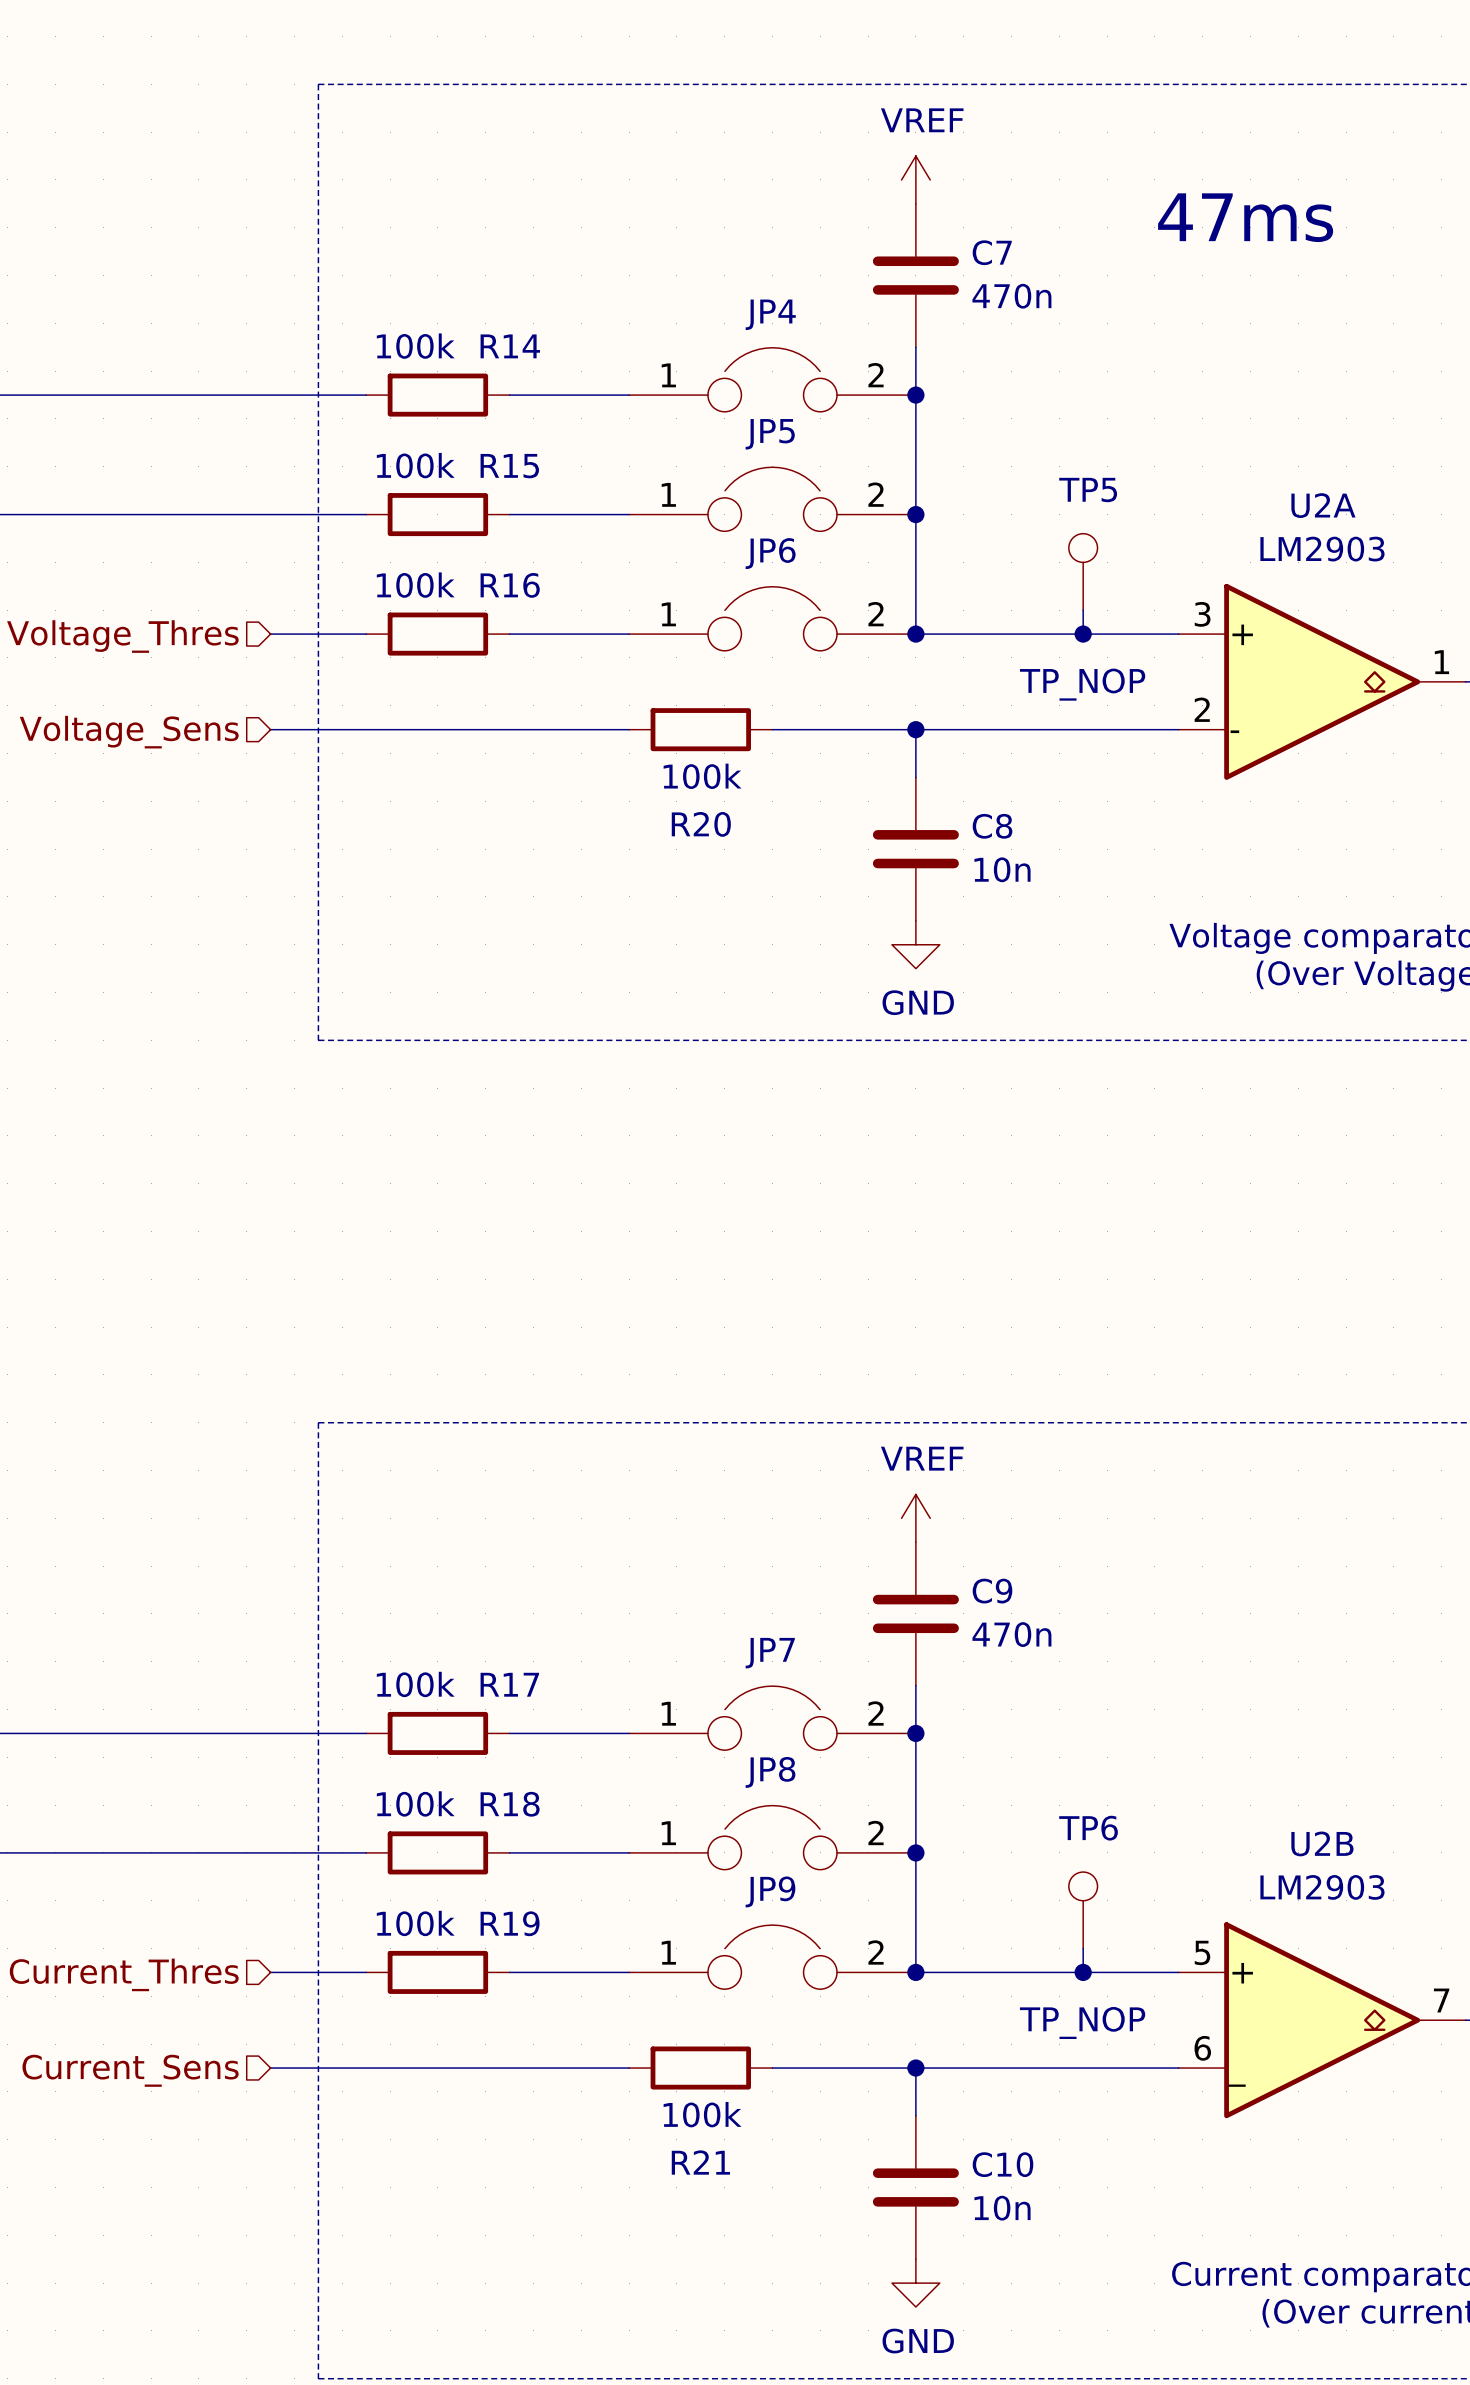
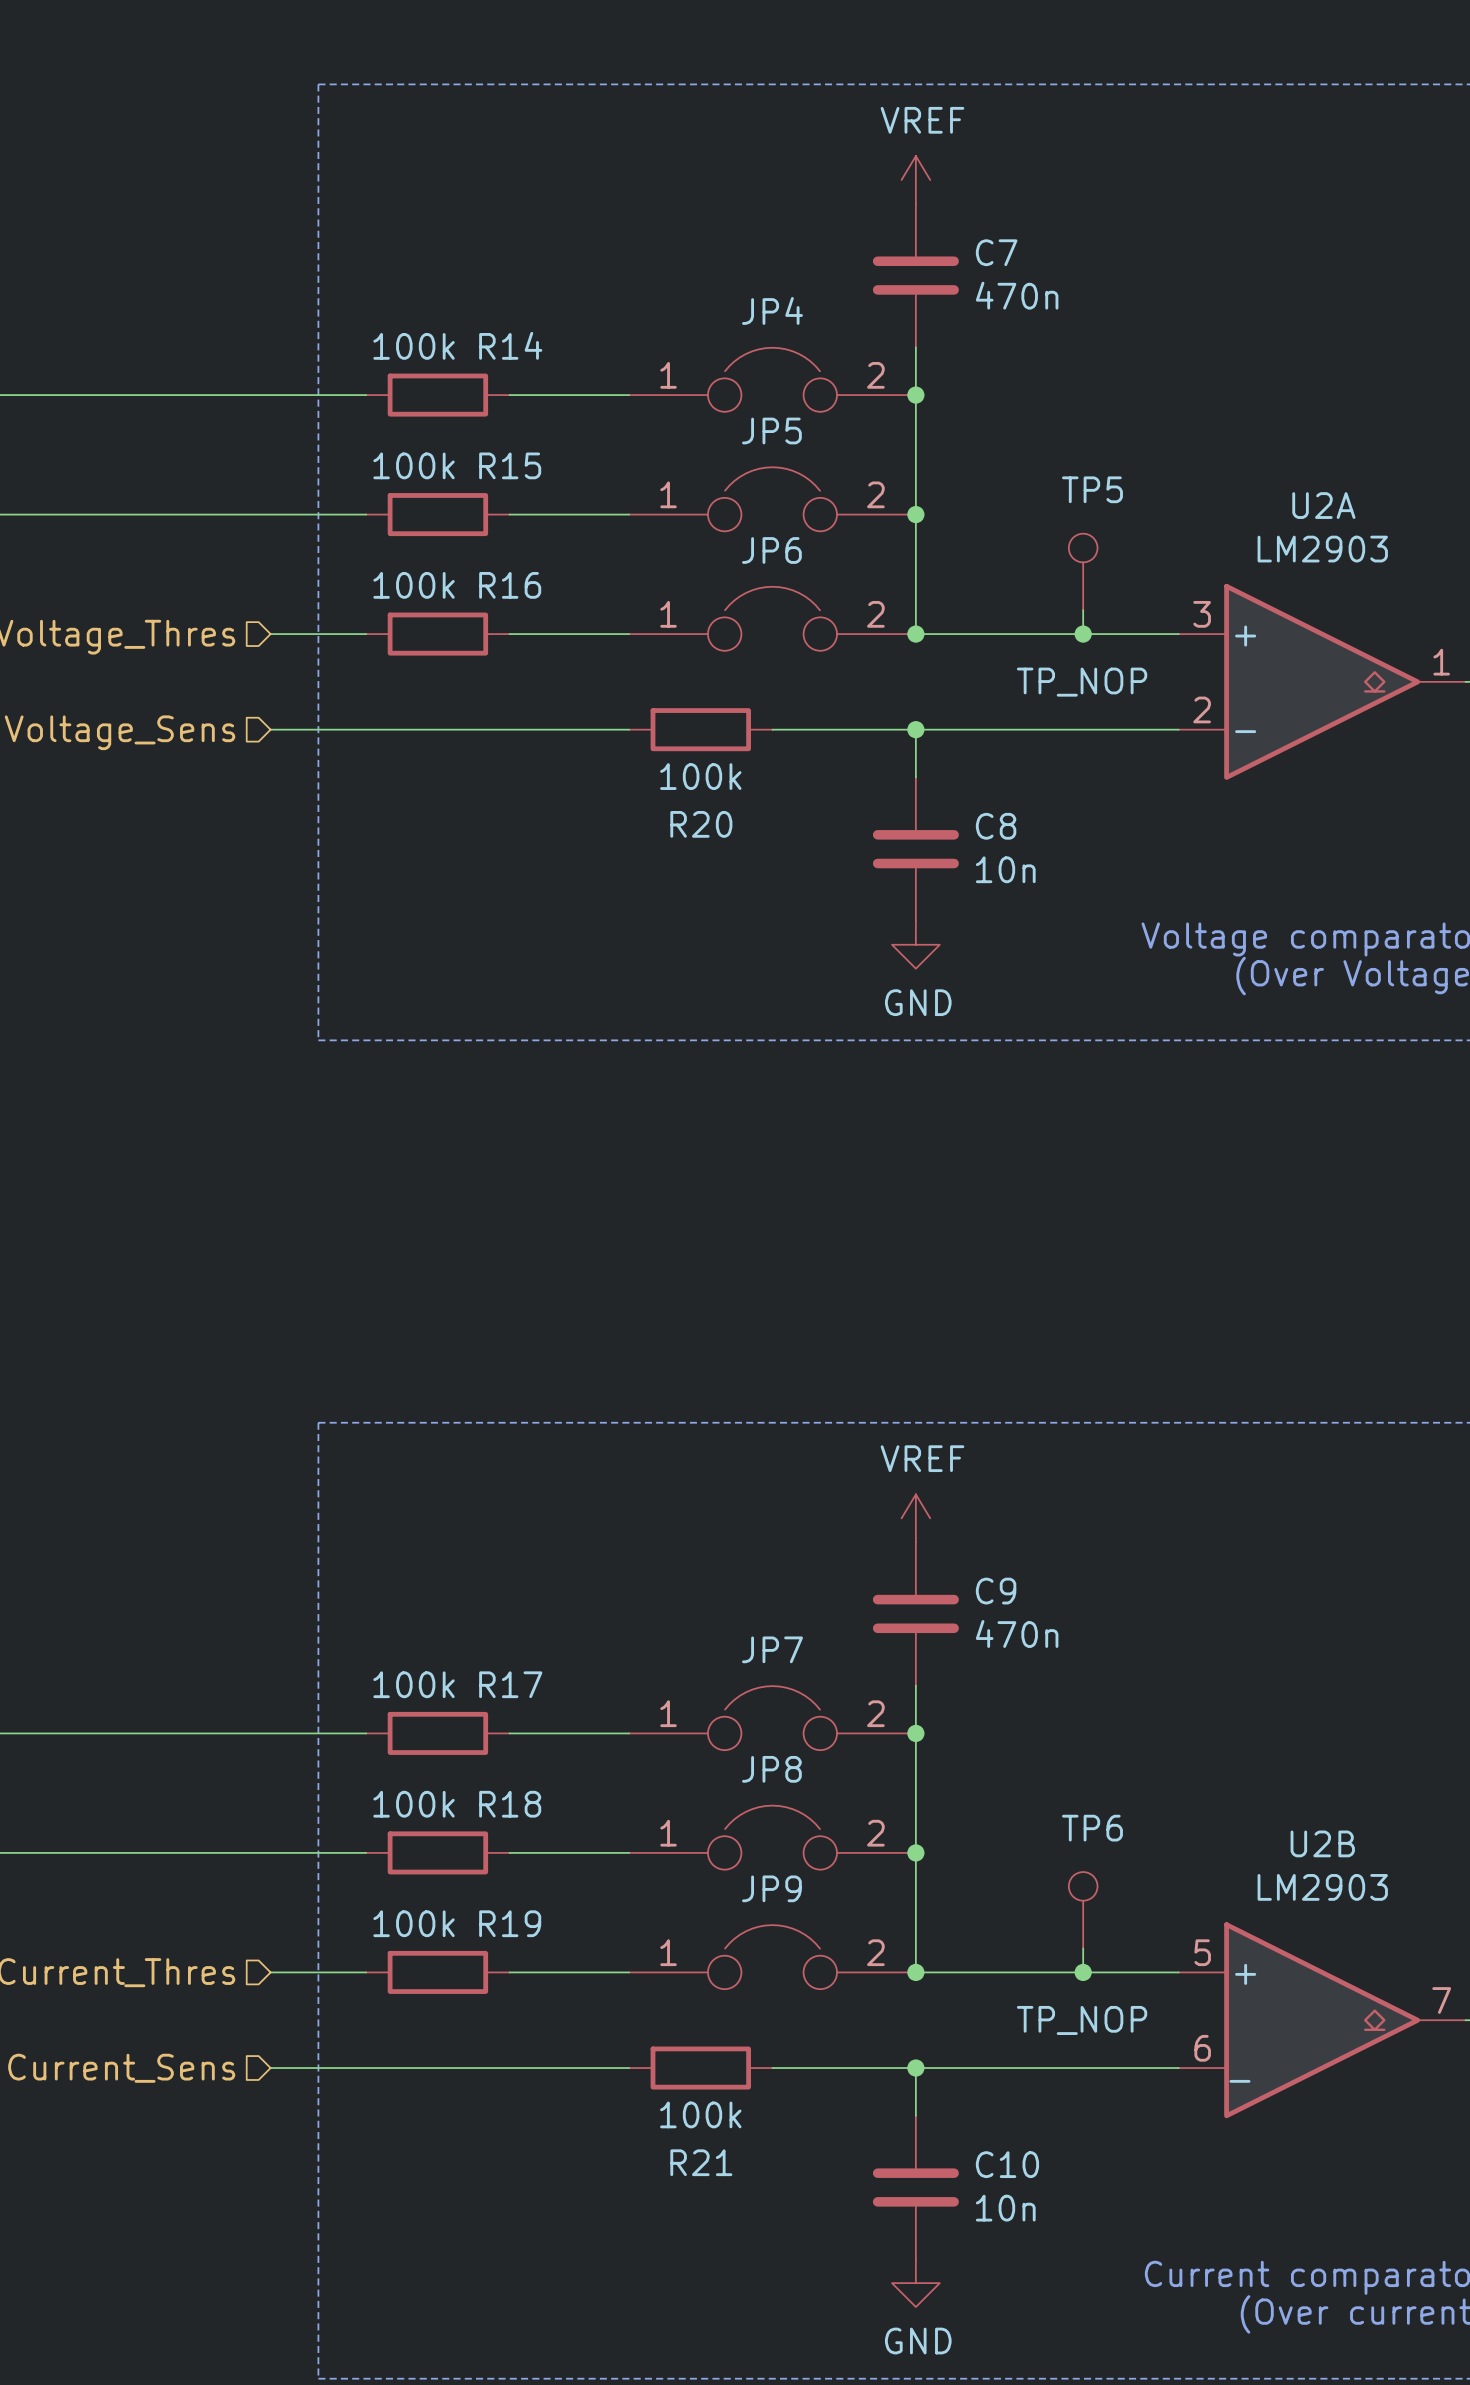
text: 47ms (1245, 217) -> none

